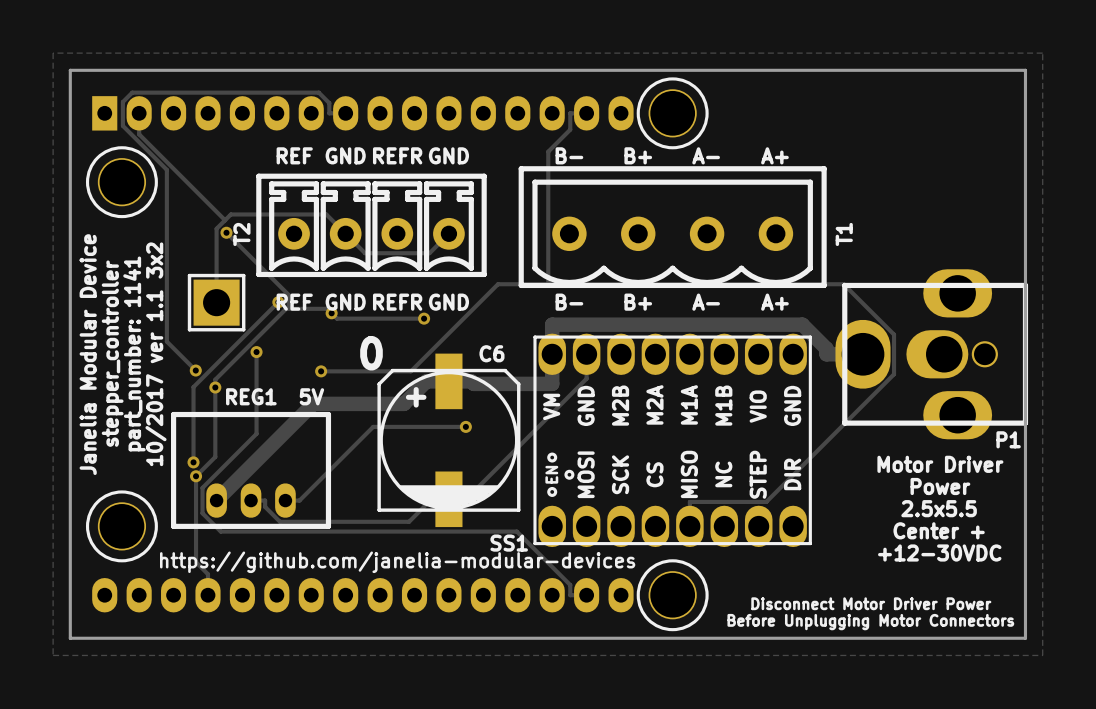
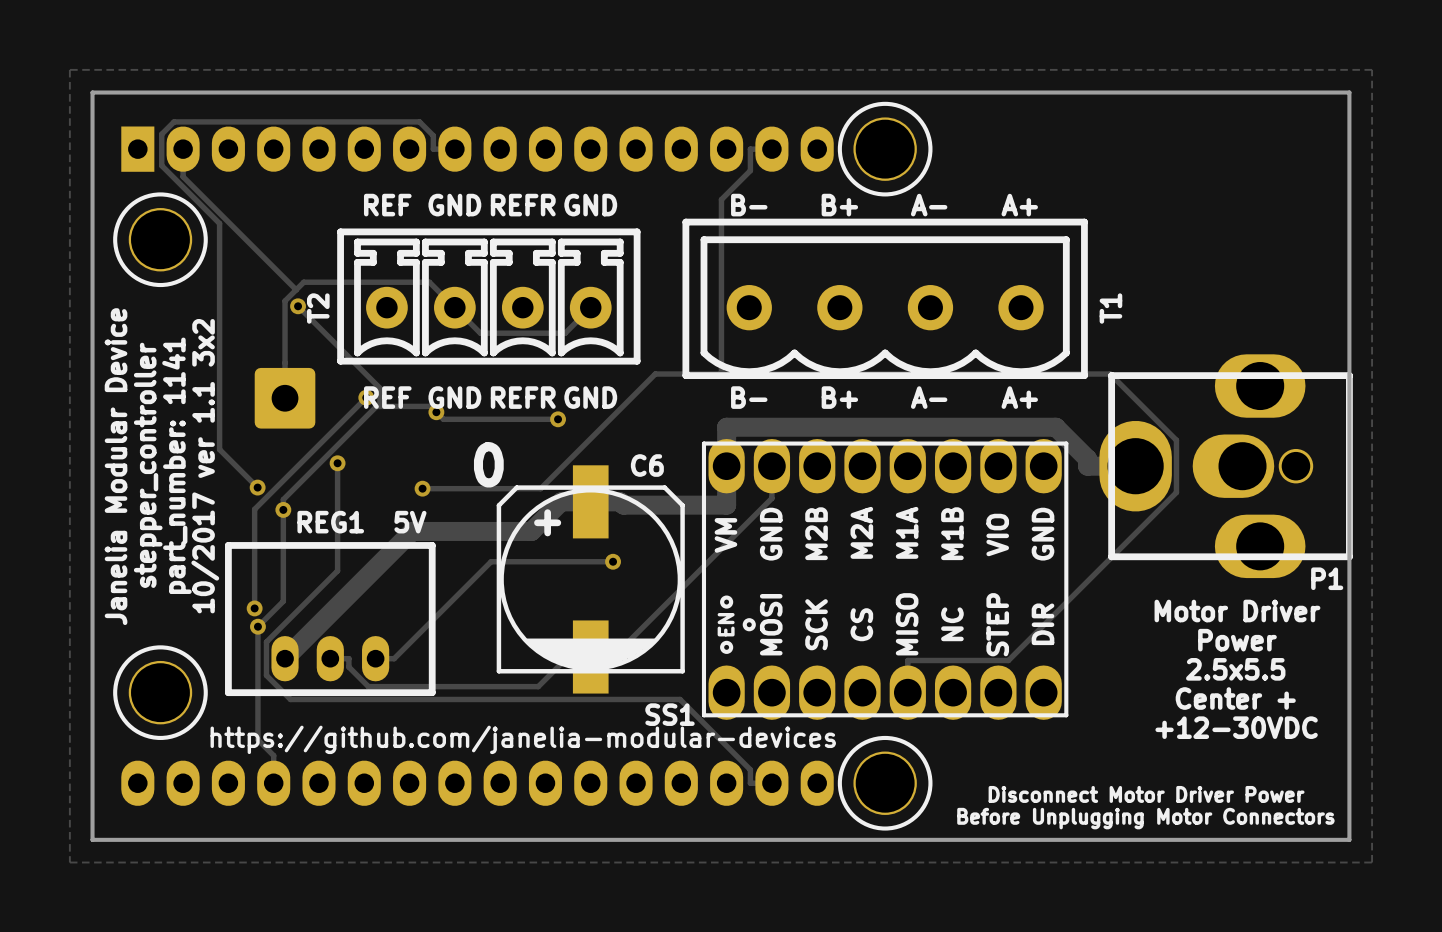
part footprint: [187, 273, 246, 332] -> [254, 367, 316, 429]

